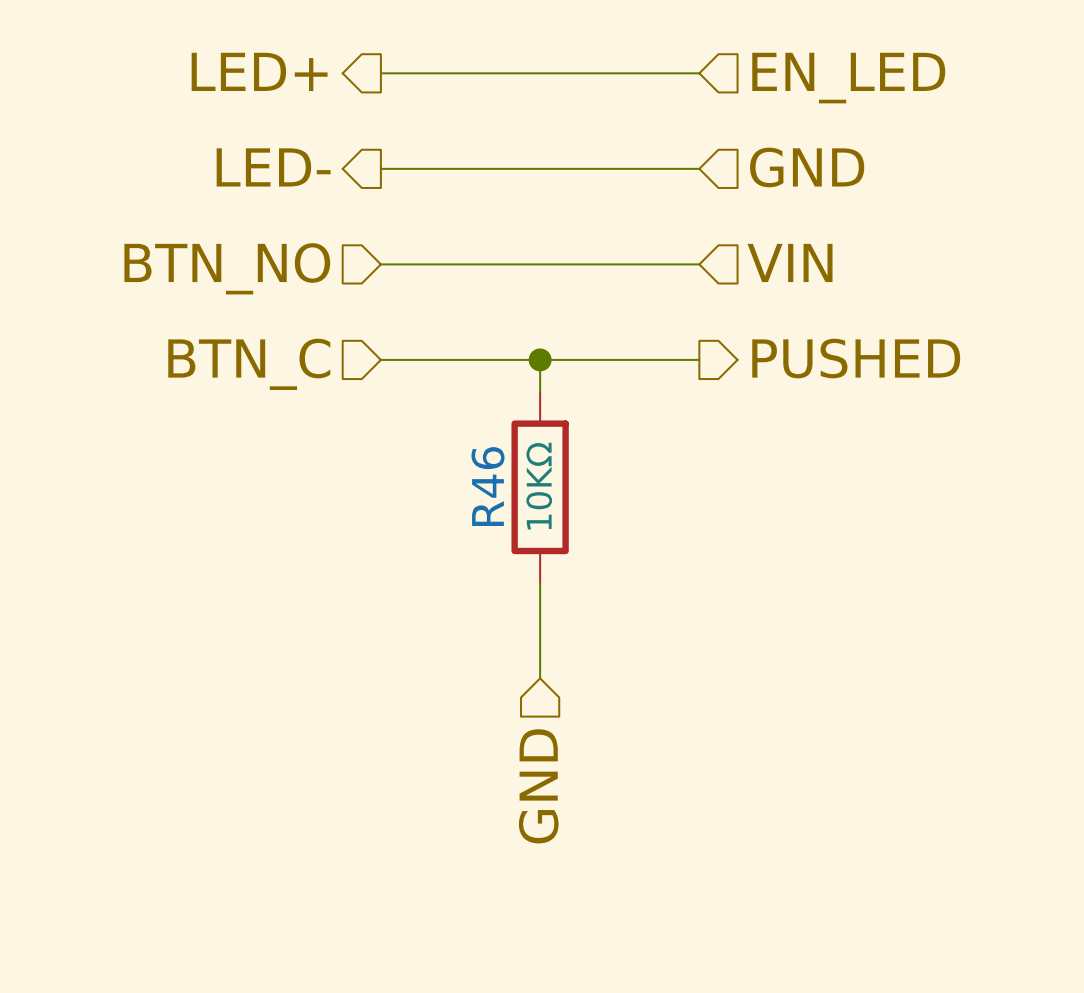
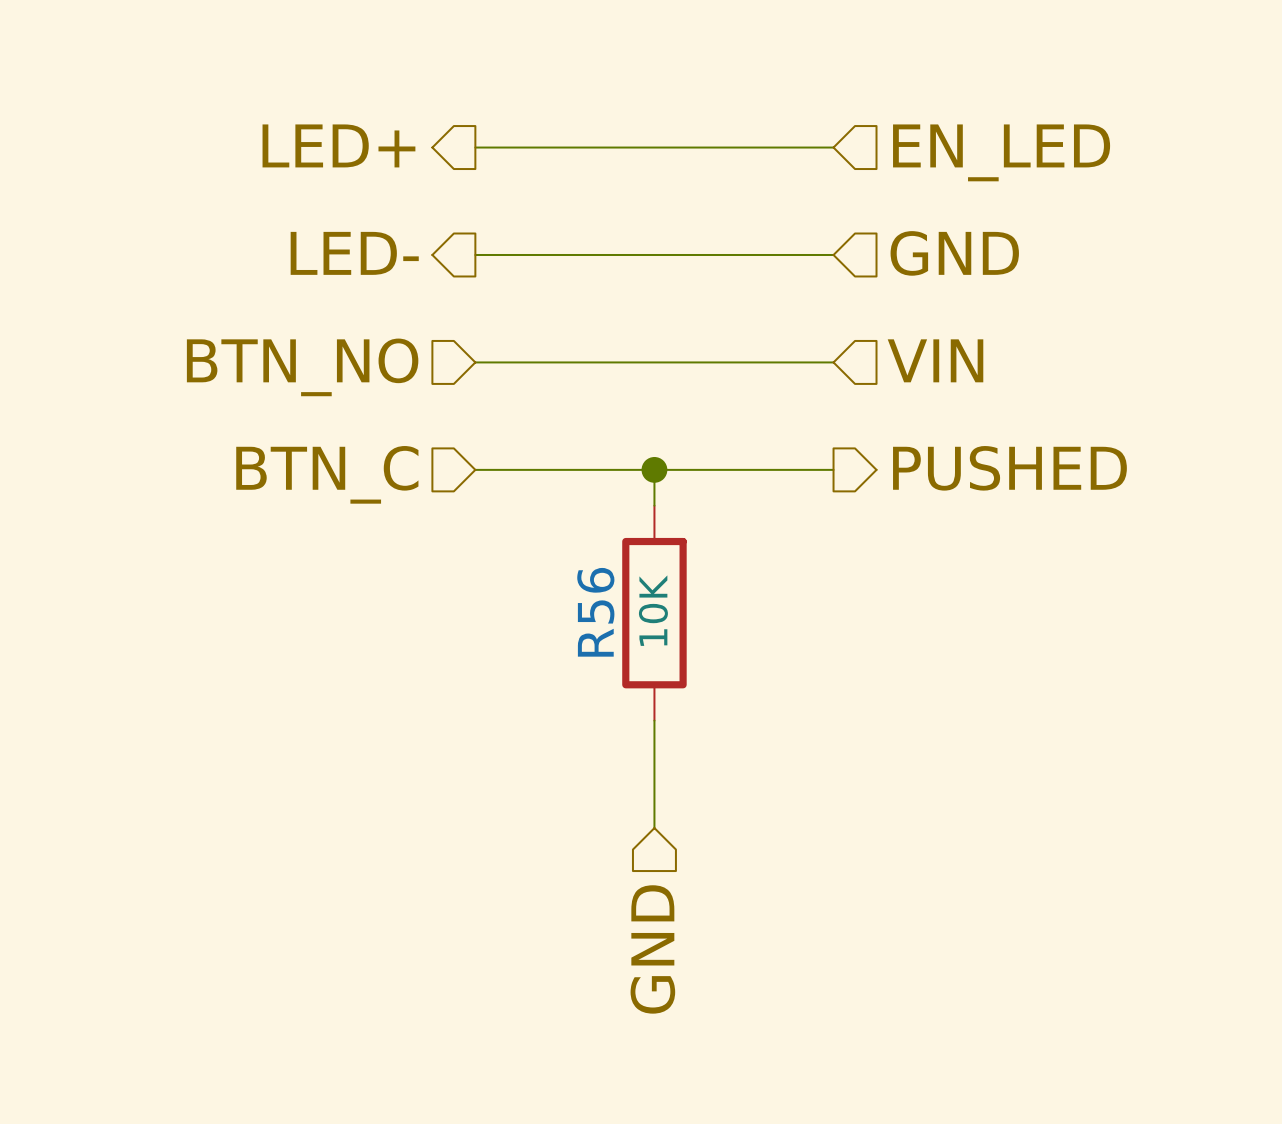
R46 name: R46 (488, 486) -> R56 (595, 612)
R46 value: 10KΩ (539, 486) -> 10K (653, 610)

